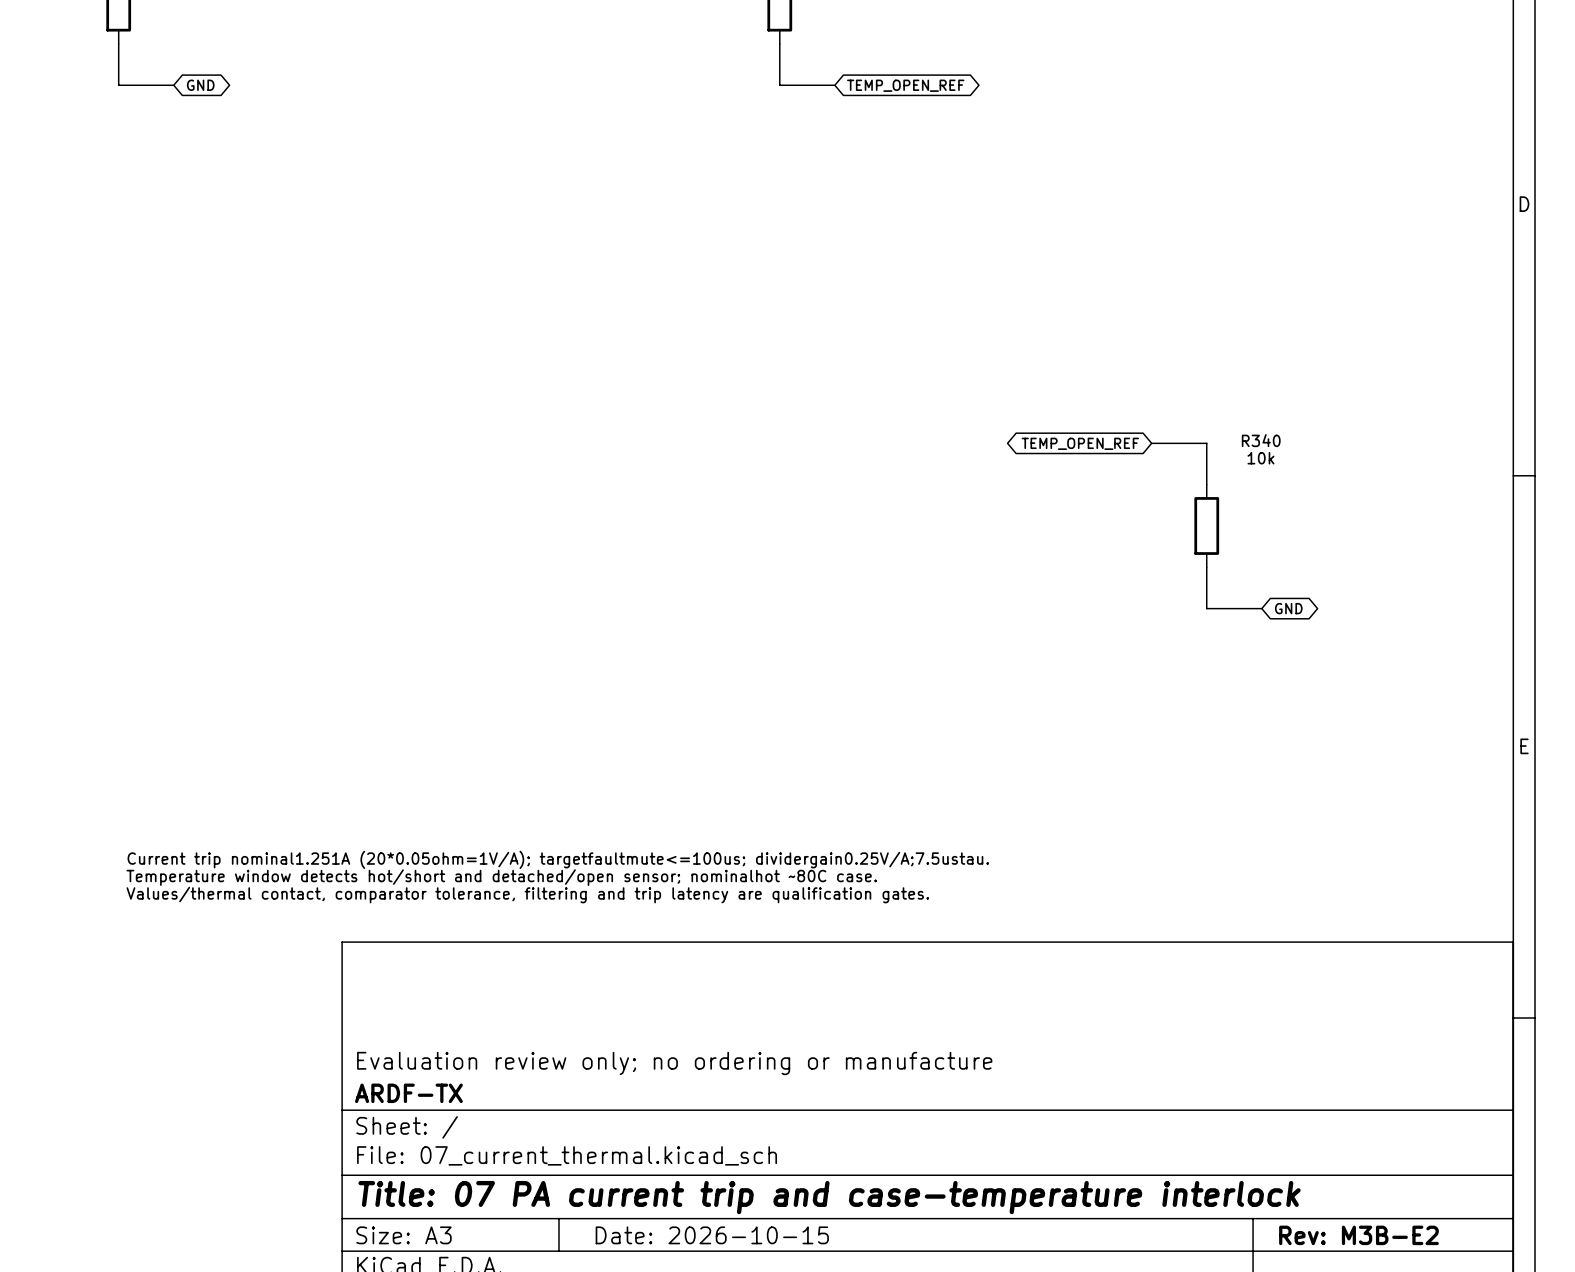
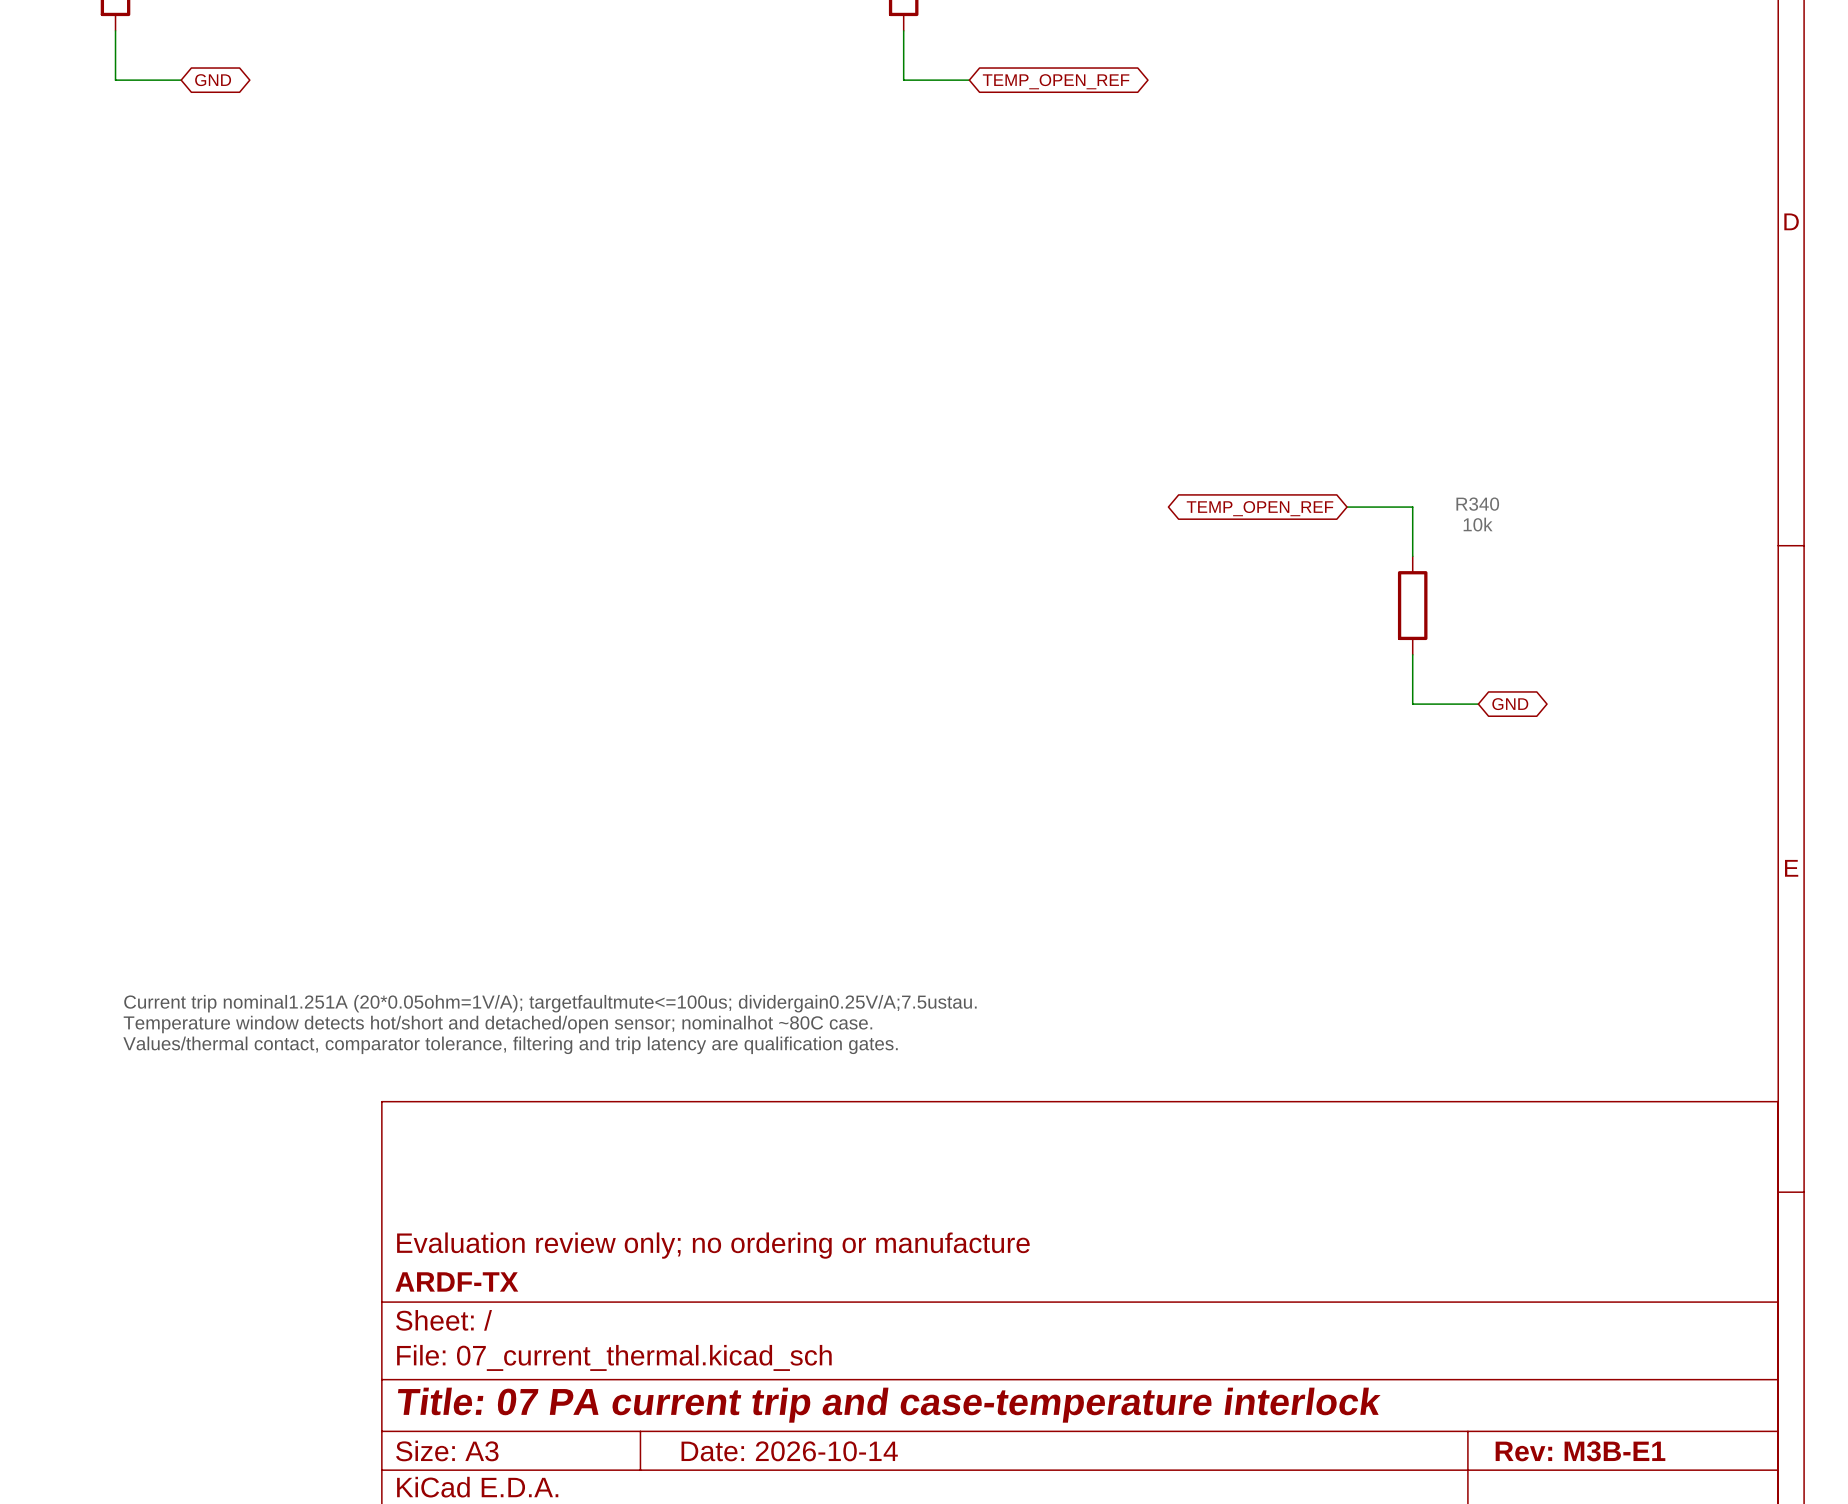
title block: Date: 2026-10-15 (712, 1235) -> Date: 2026-10-14 (789, 1451)
title block: Rev: M3B-E2 (1358, 1235) -> Rev: M3B-E1 (1580, 1451)

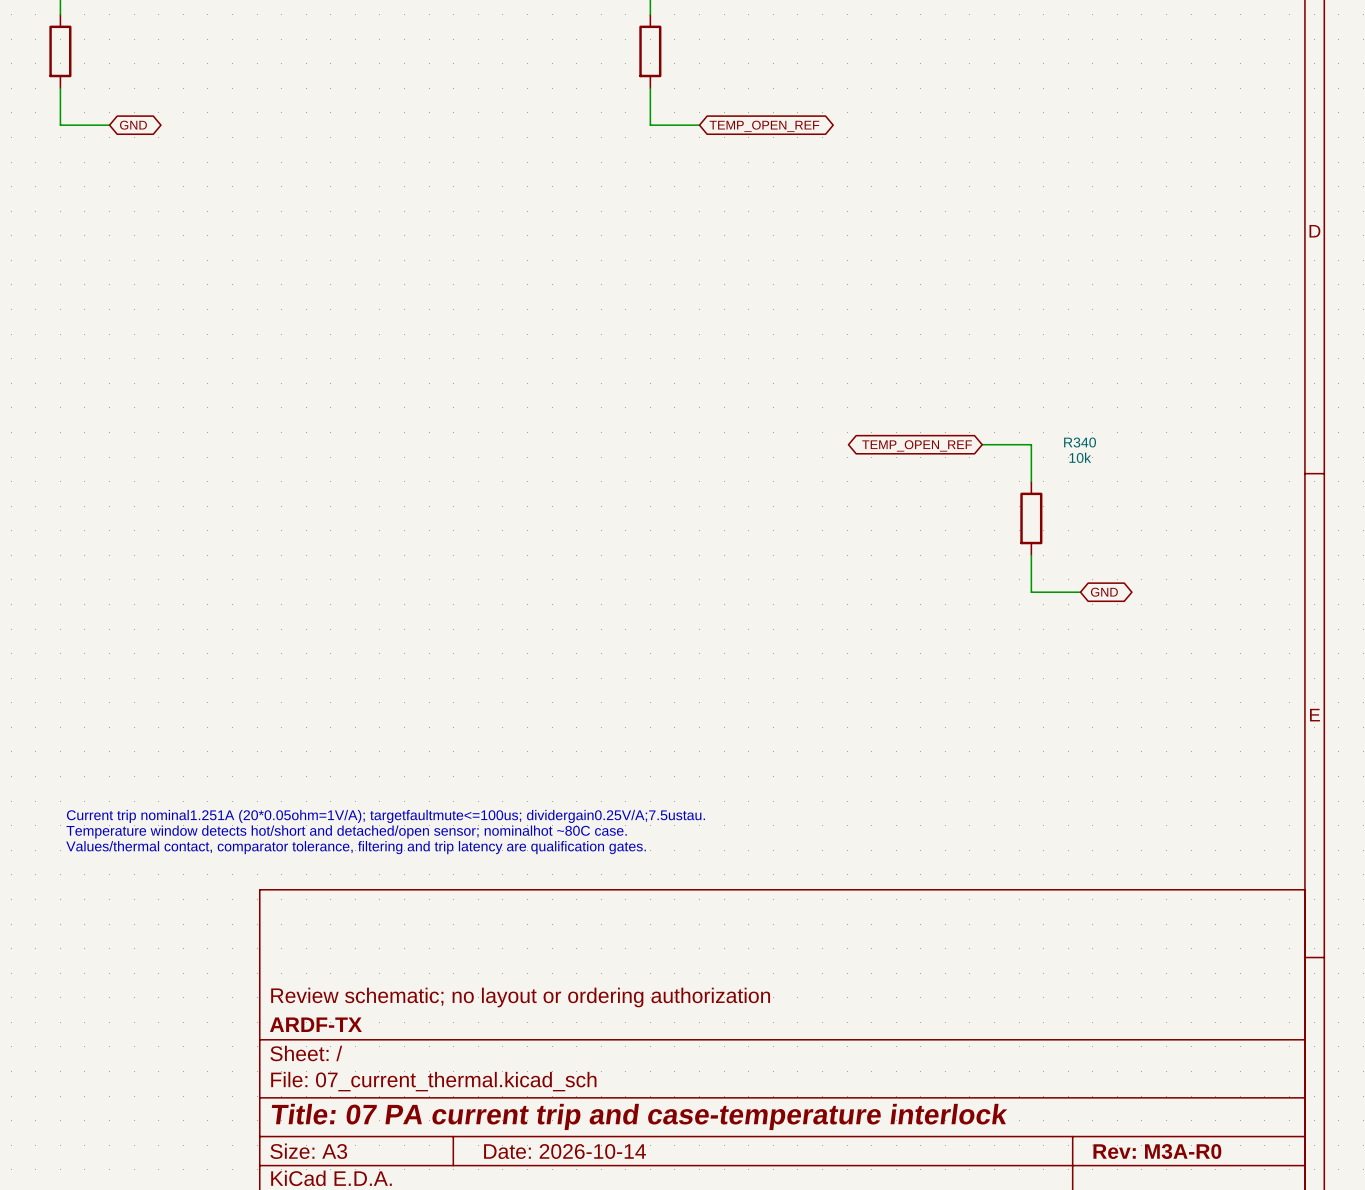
title block: Evaluation review only; no ordering or manufacture (713, 1245) -> Review schematic; no layout or ordering authorization (520, 997)
title block: Rev: M3B-E1 (1580, 1451) -> Rev: M3A-R0 (1157, 1151)

